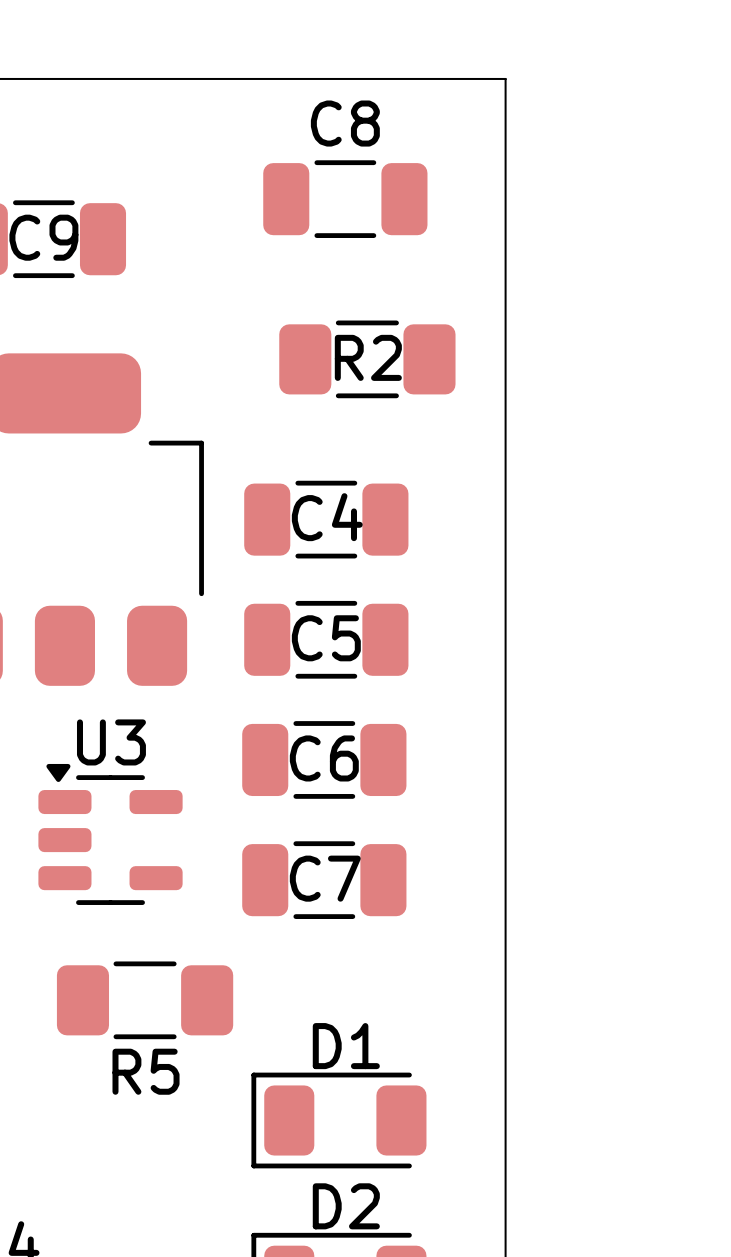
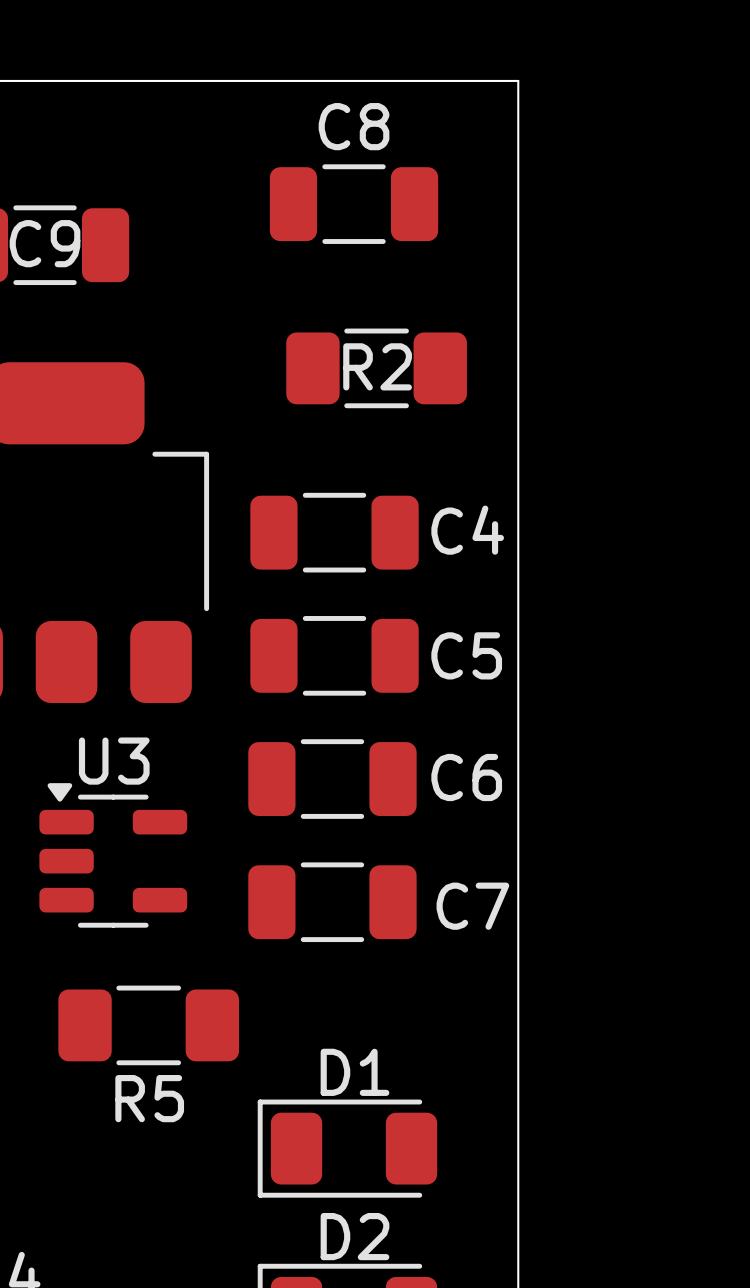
C4 name position: C4 (327, 517) -> C4 (467, 530)
C5 name position: C5 (326, 638) -> C5 (466, 655)
C6 name position: C6 (324, 758) -> C6 (466, 777)
C7 name position: C7 (325, 878) -> C7 (472, 906)

